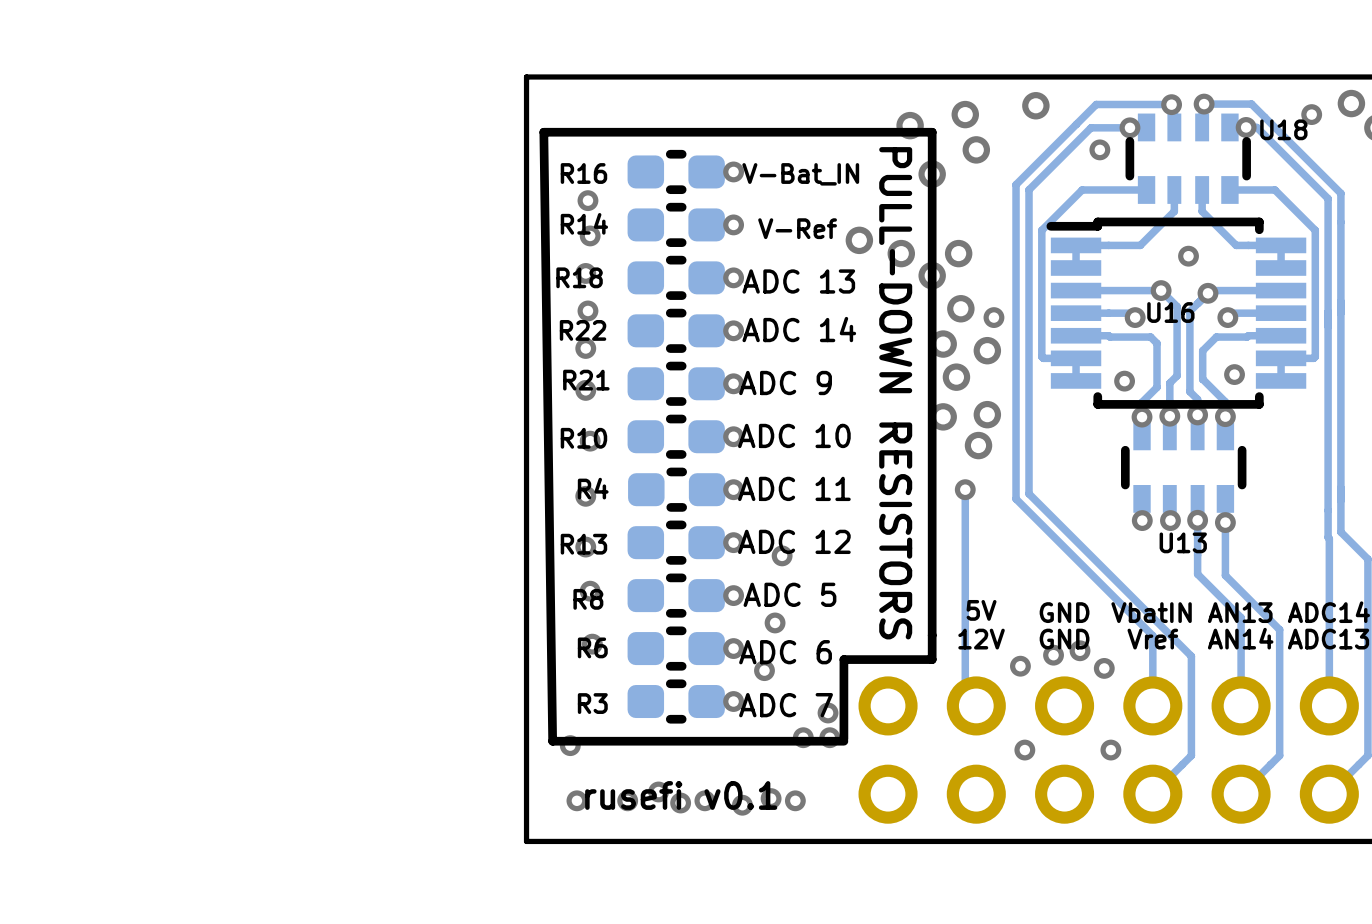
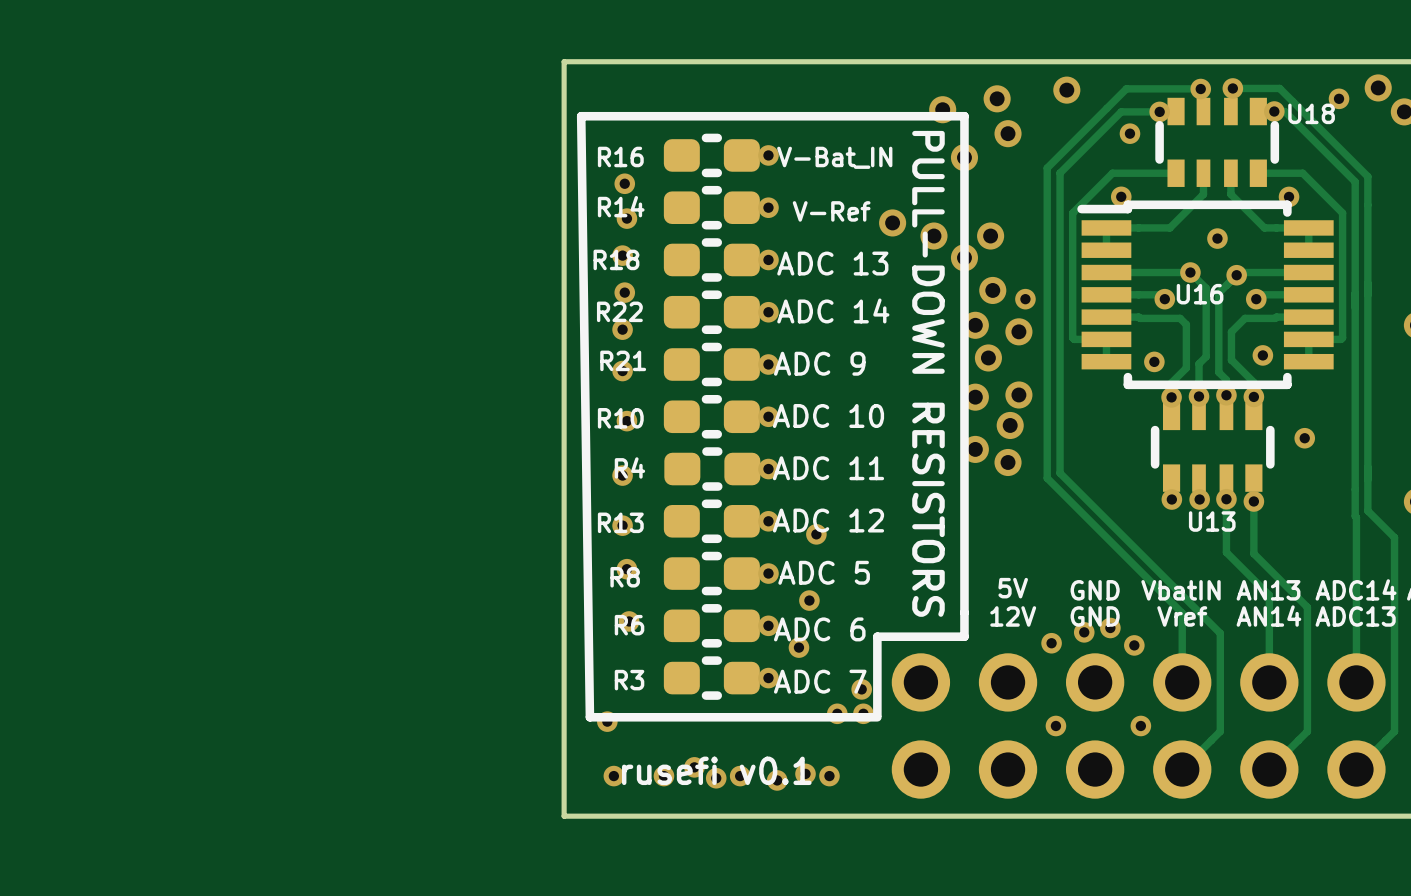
via: none -> (1121, 196)
via: none -> (1289, 196)
via: none -> (1304, 438)
via: none -> (975, 449)
via size: [954, 479, 976, 501] -> [994, 448, 1022, 477]
track: (965, 489) (965, 694) (976, 705) -> none

